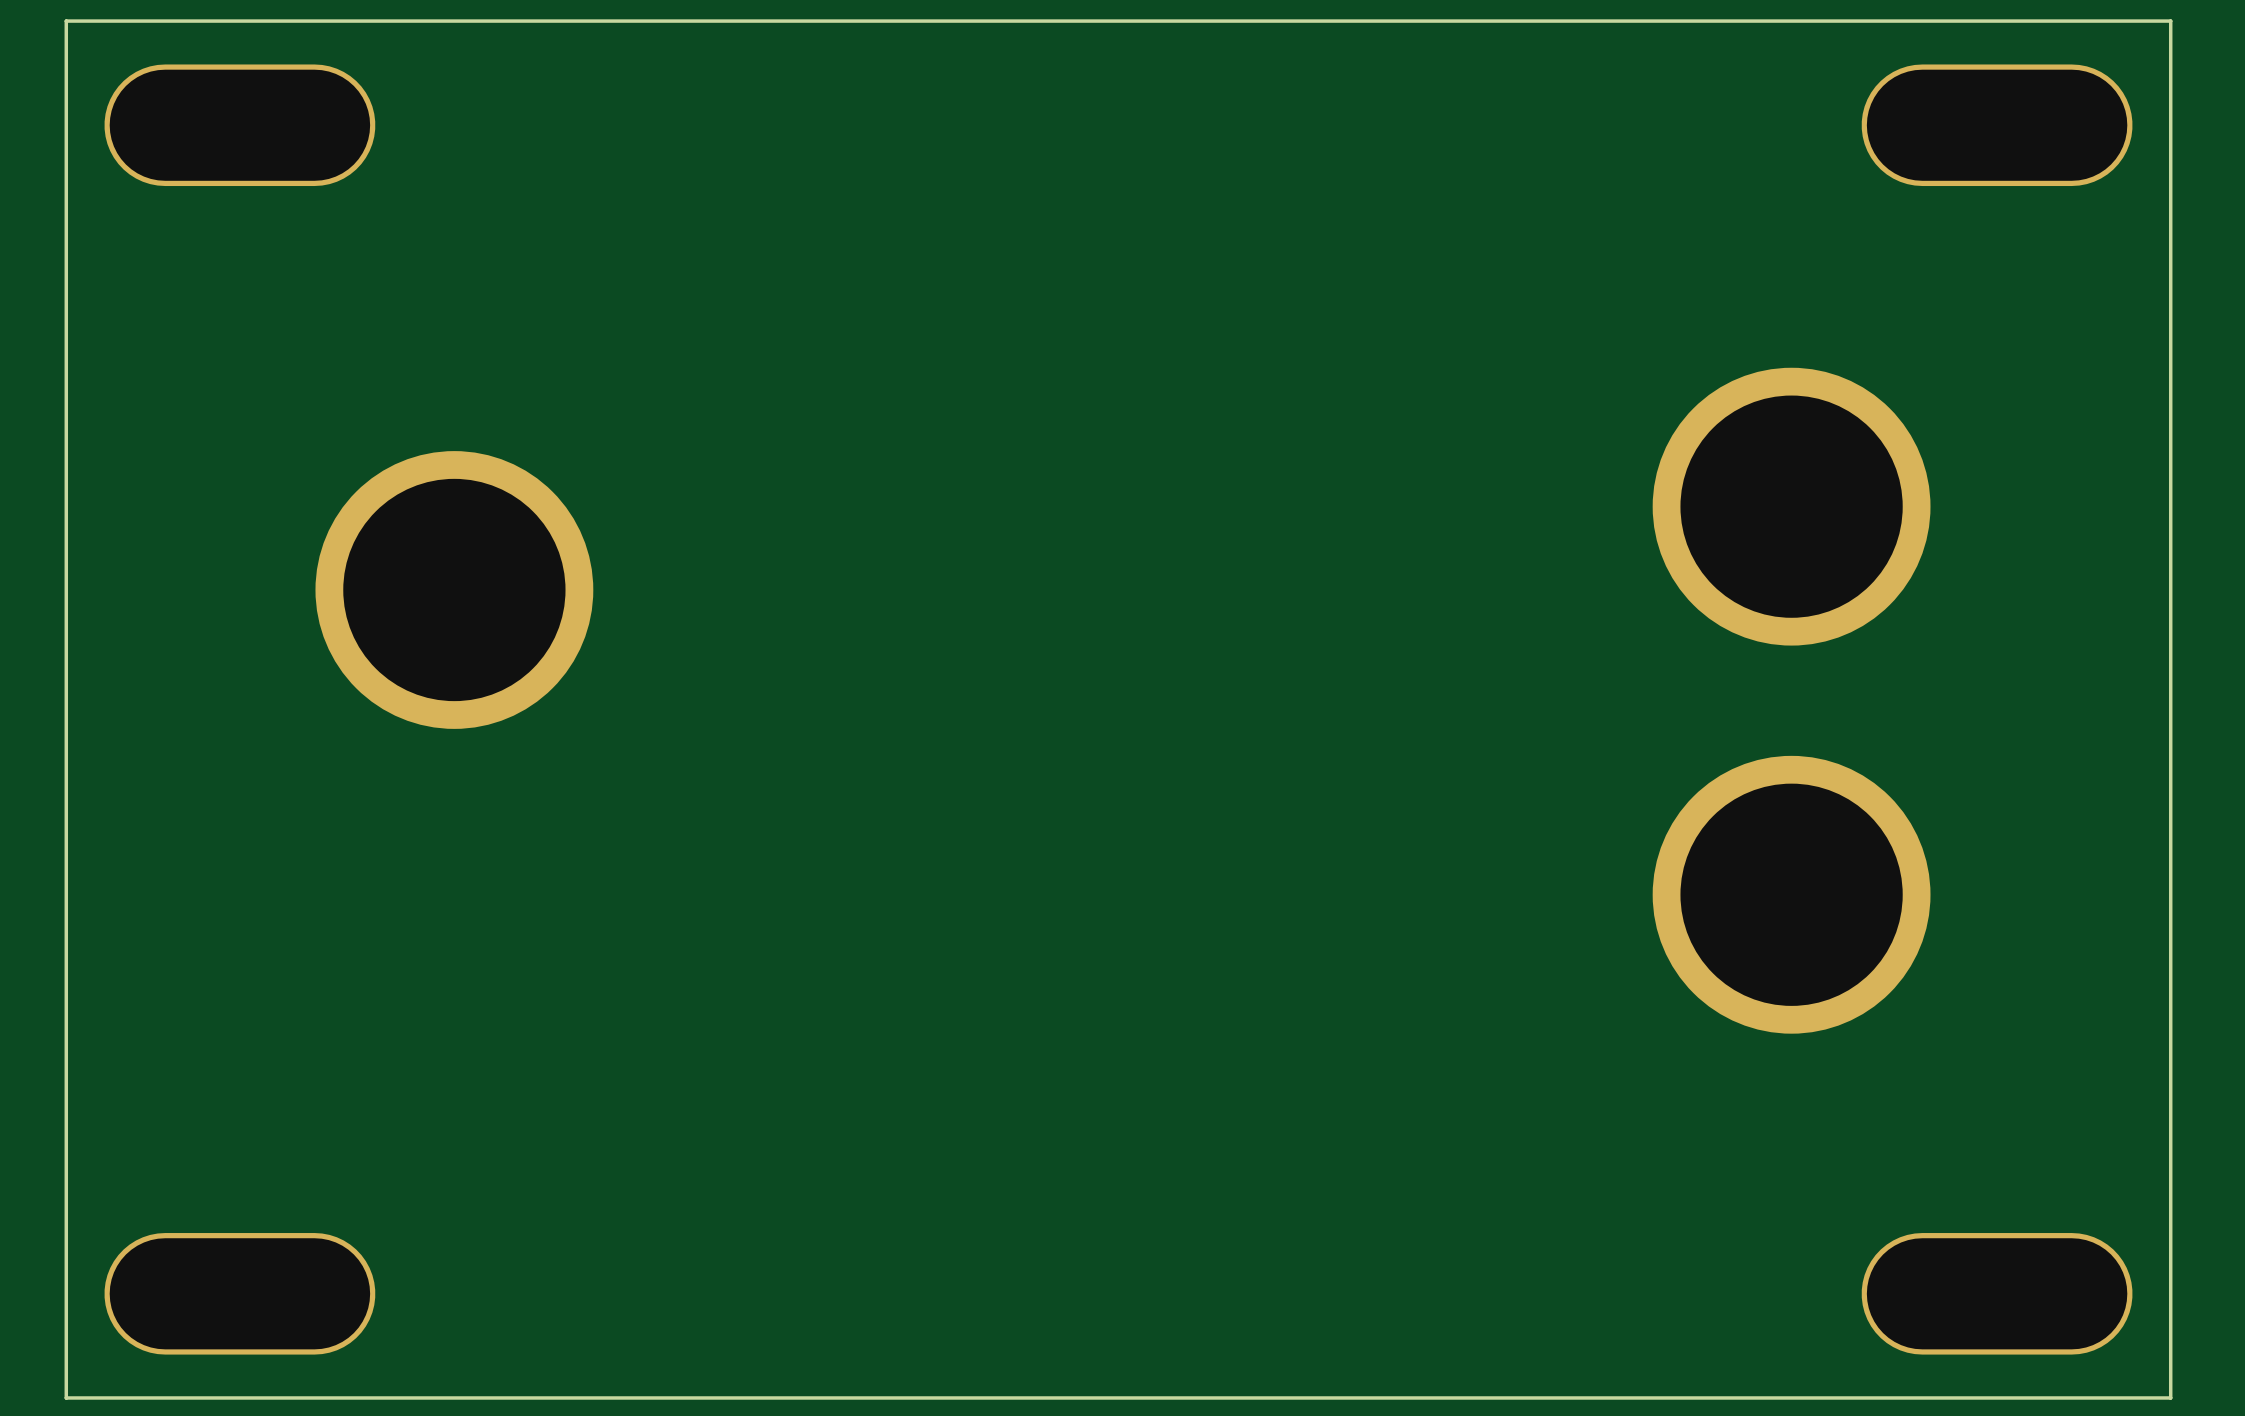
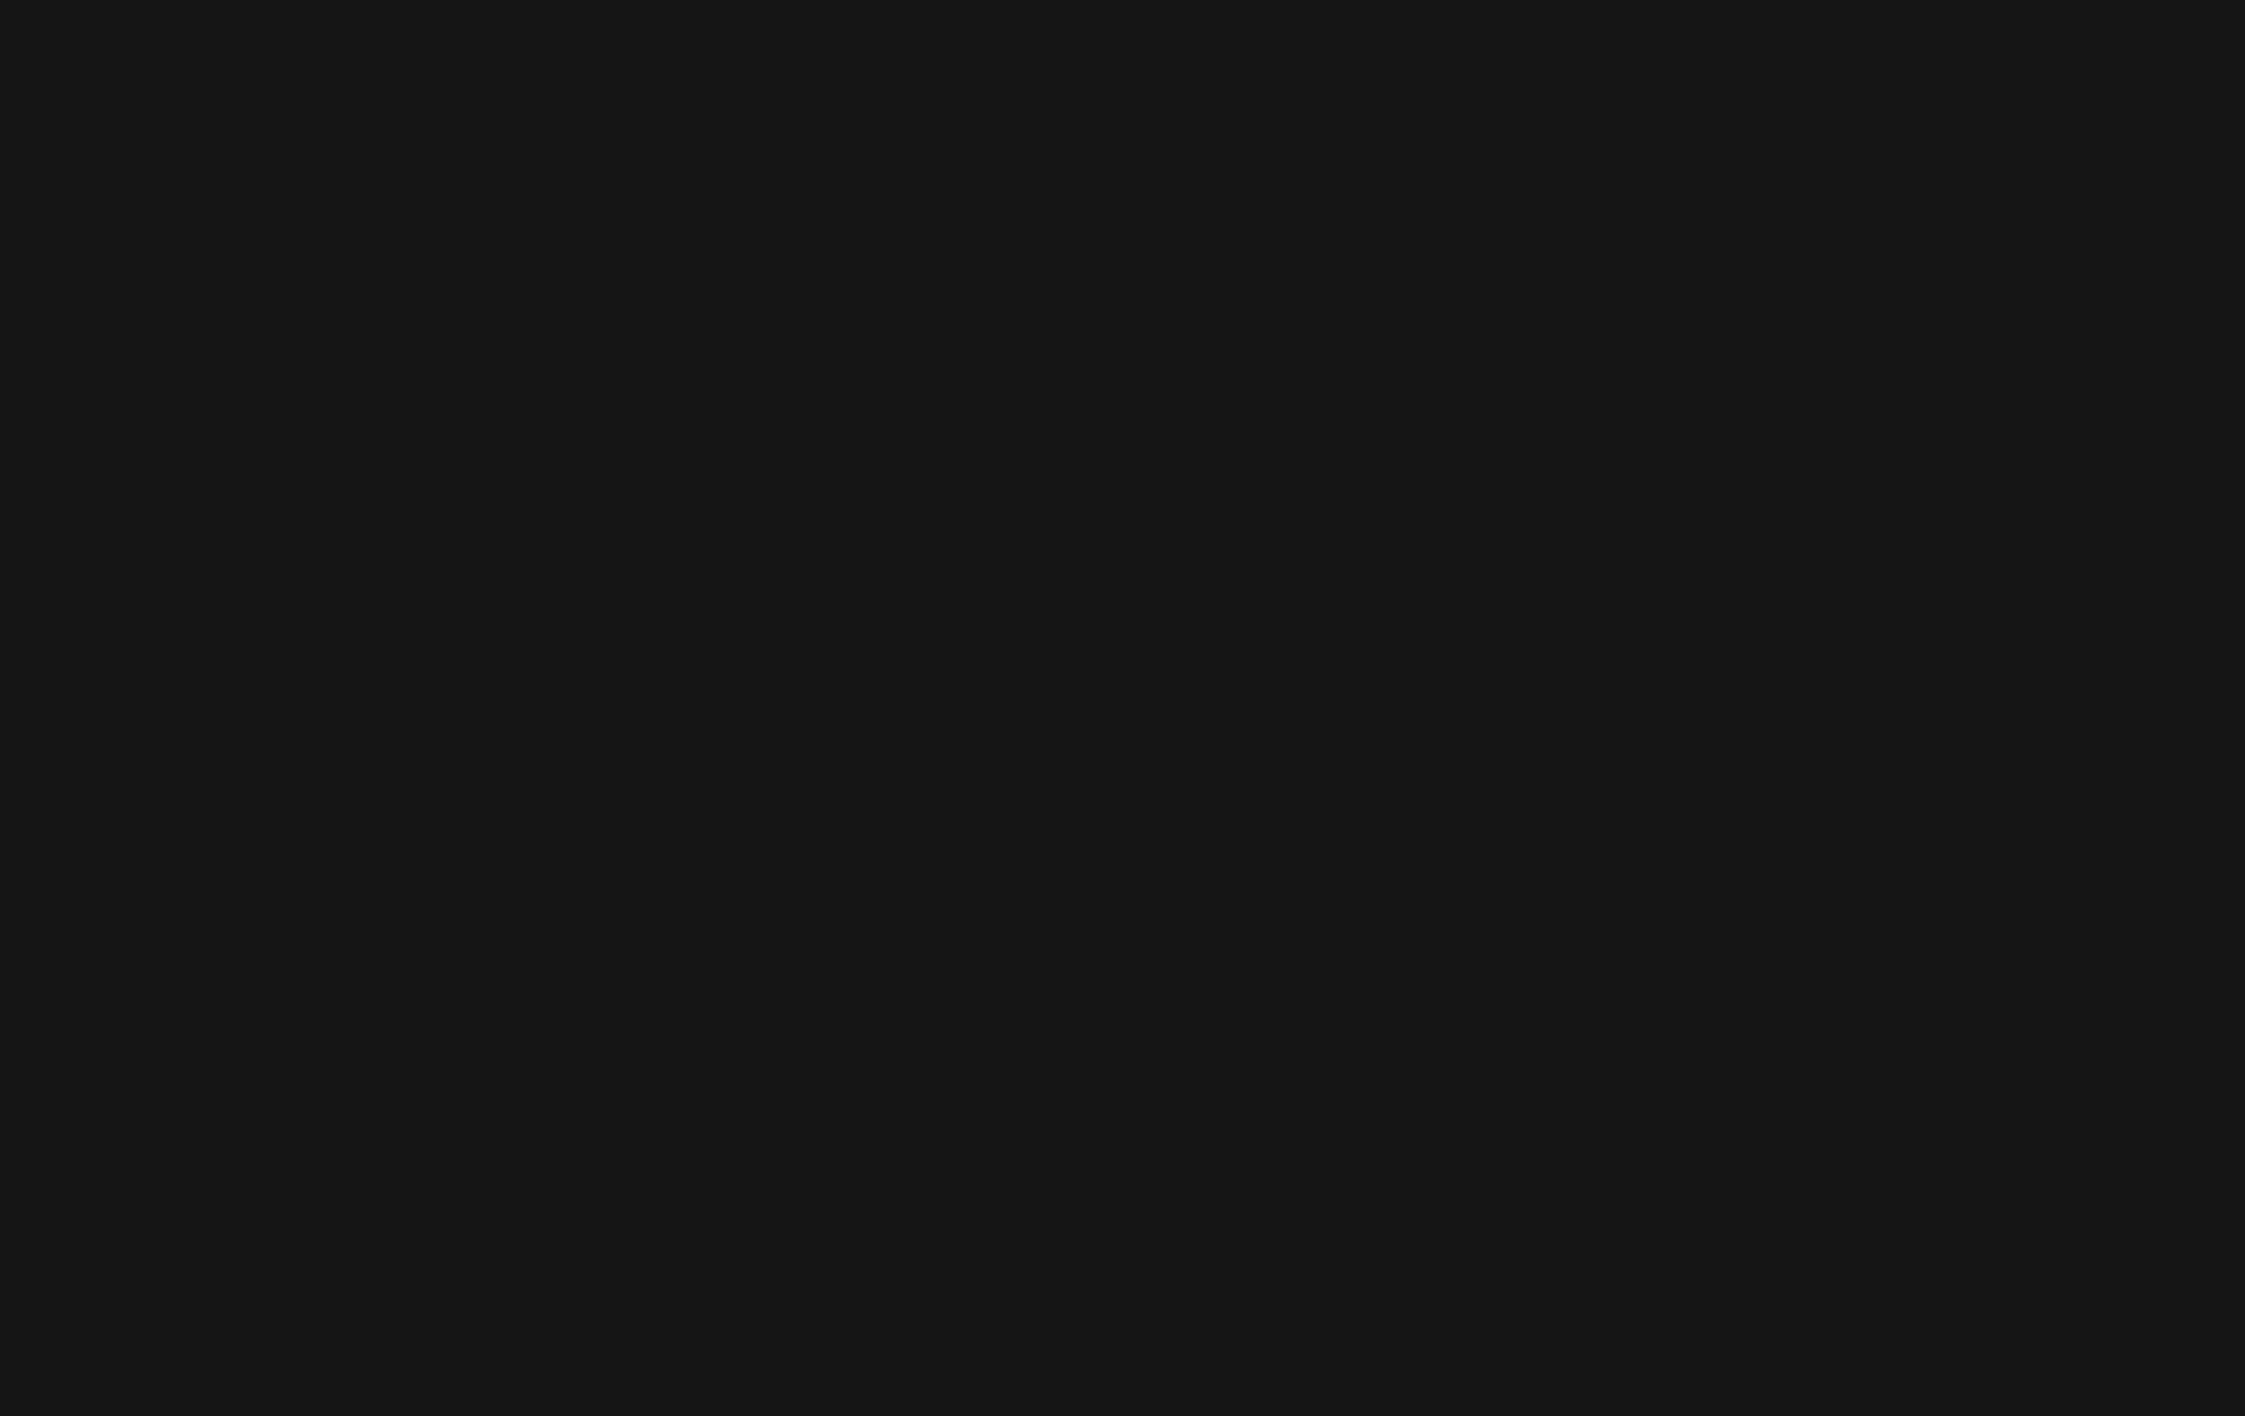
board edge: (2170, 21) (66, 21) (66, 1397) (2170, 1397) (2170, 21) -> none
part: (239, 125) -> none
part: (1997, 125) -> none
part: (1791, 506) -> none
part: (454, 589) -> none
part: (1791, 894) -> none
part: (239, 1293) -> none
part: (1997, 1293) -> none

